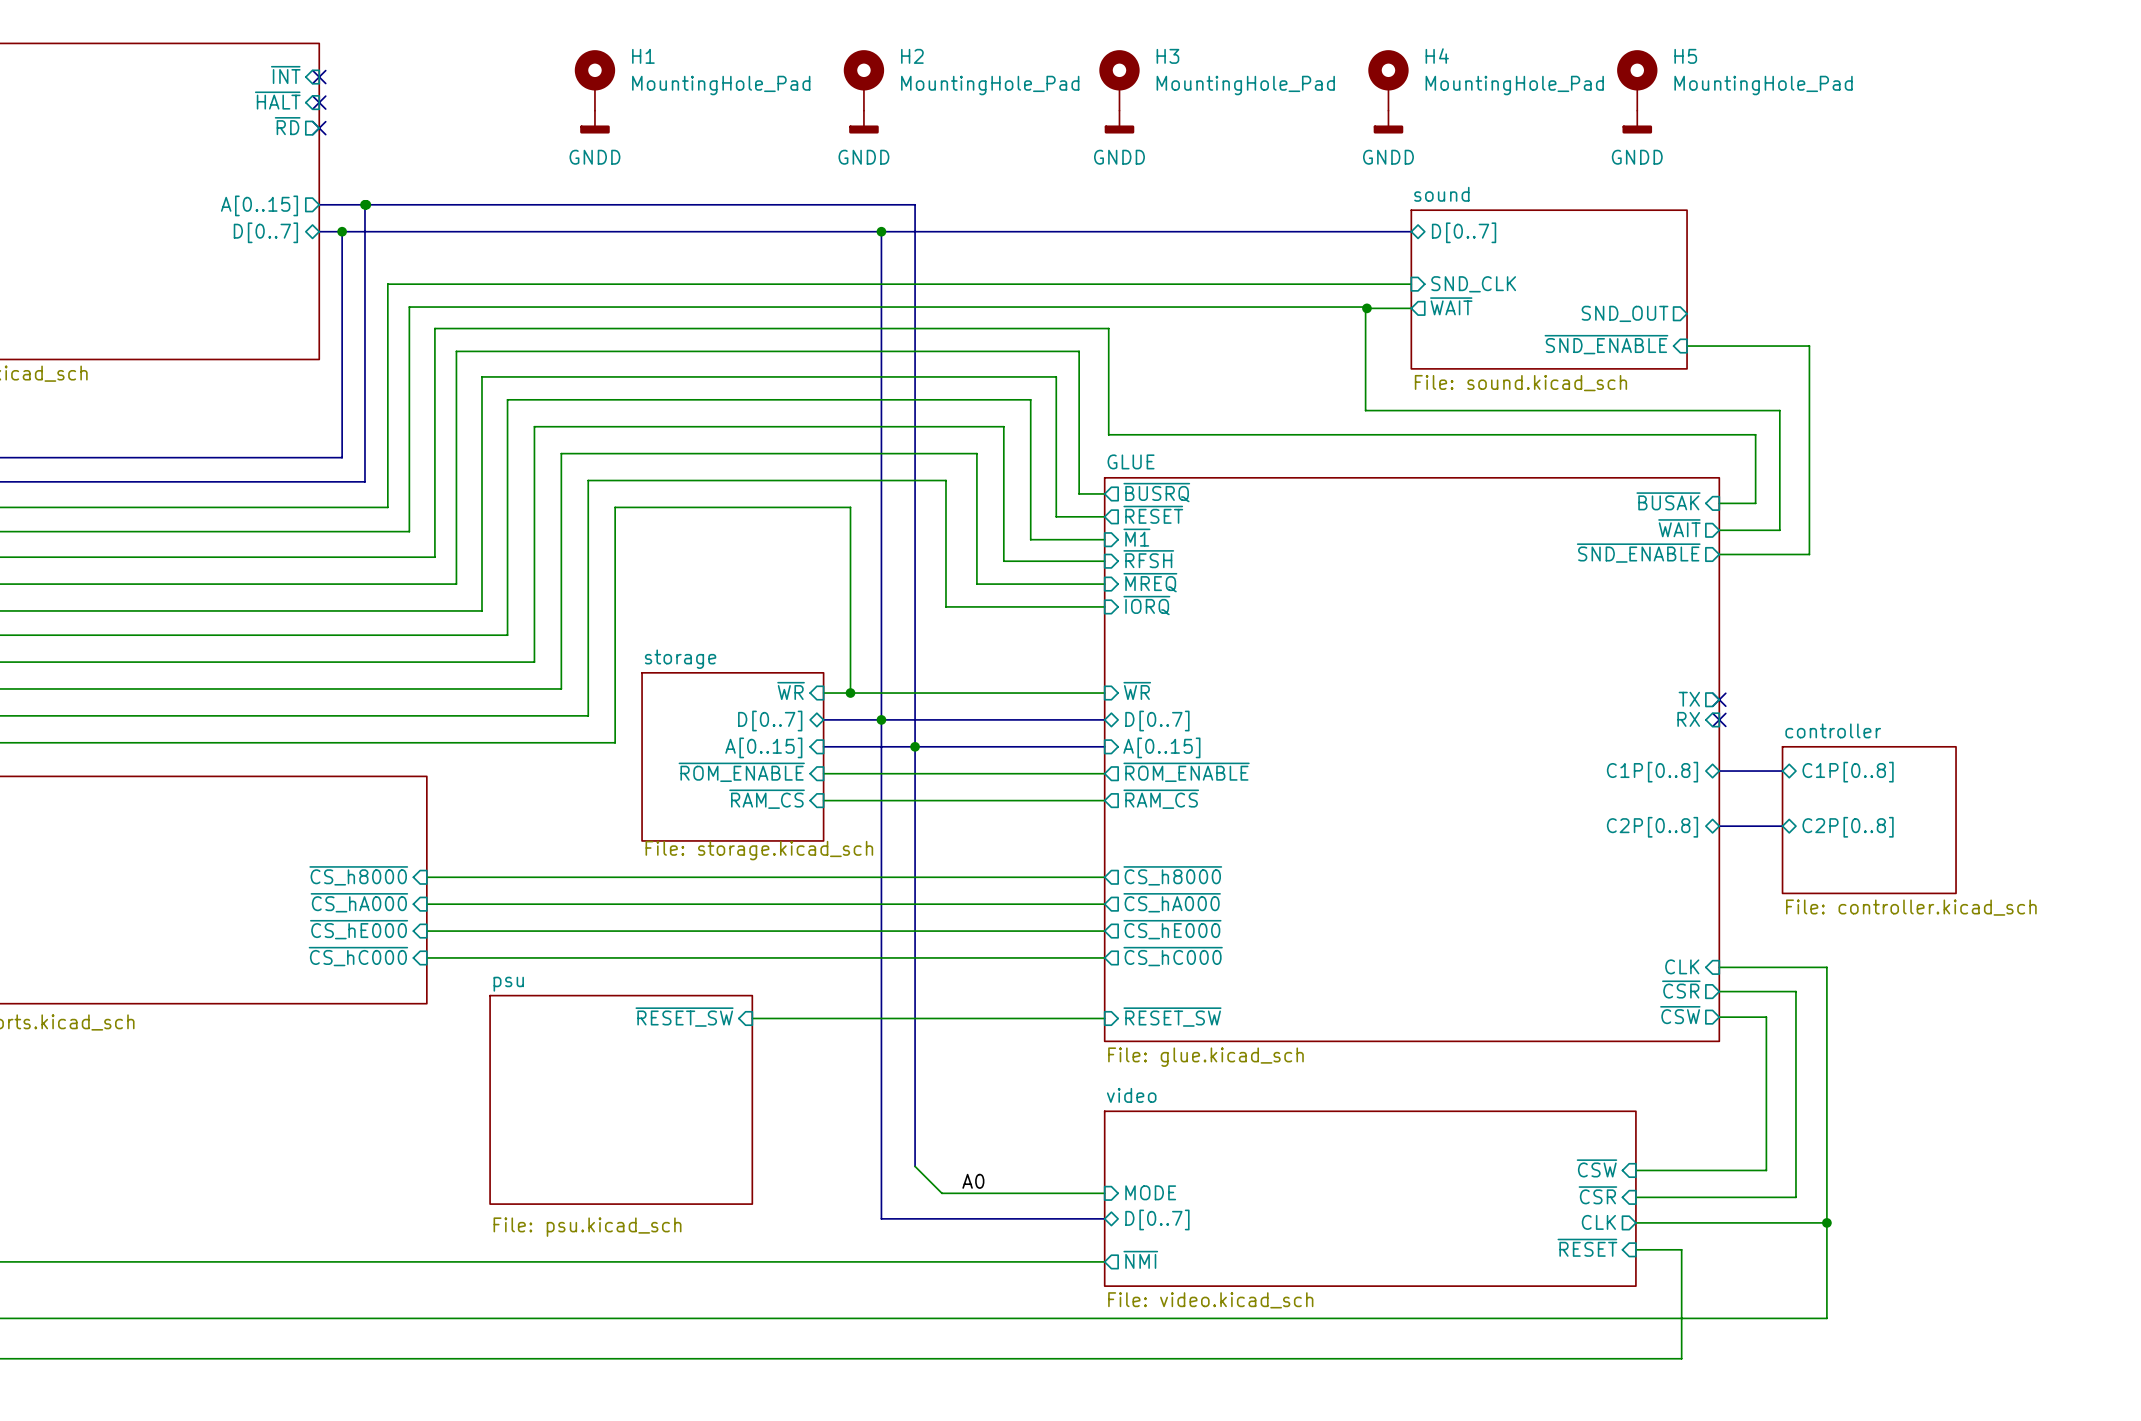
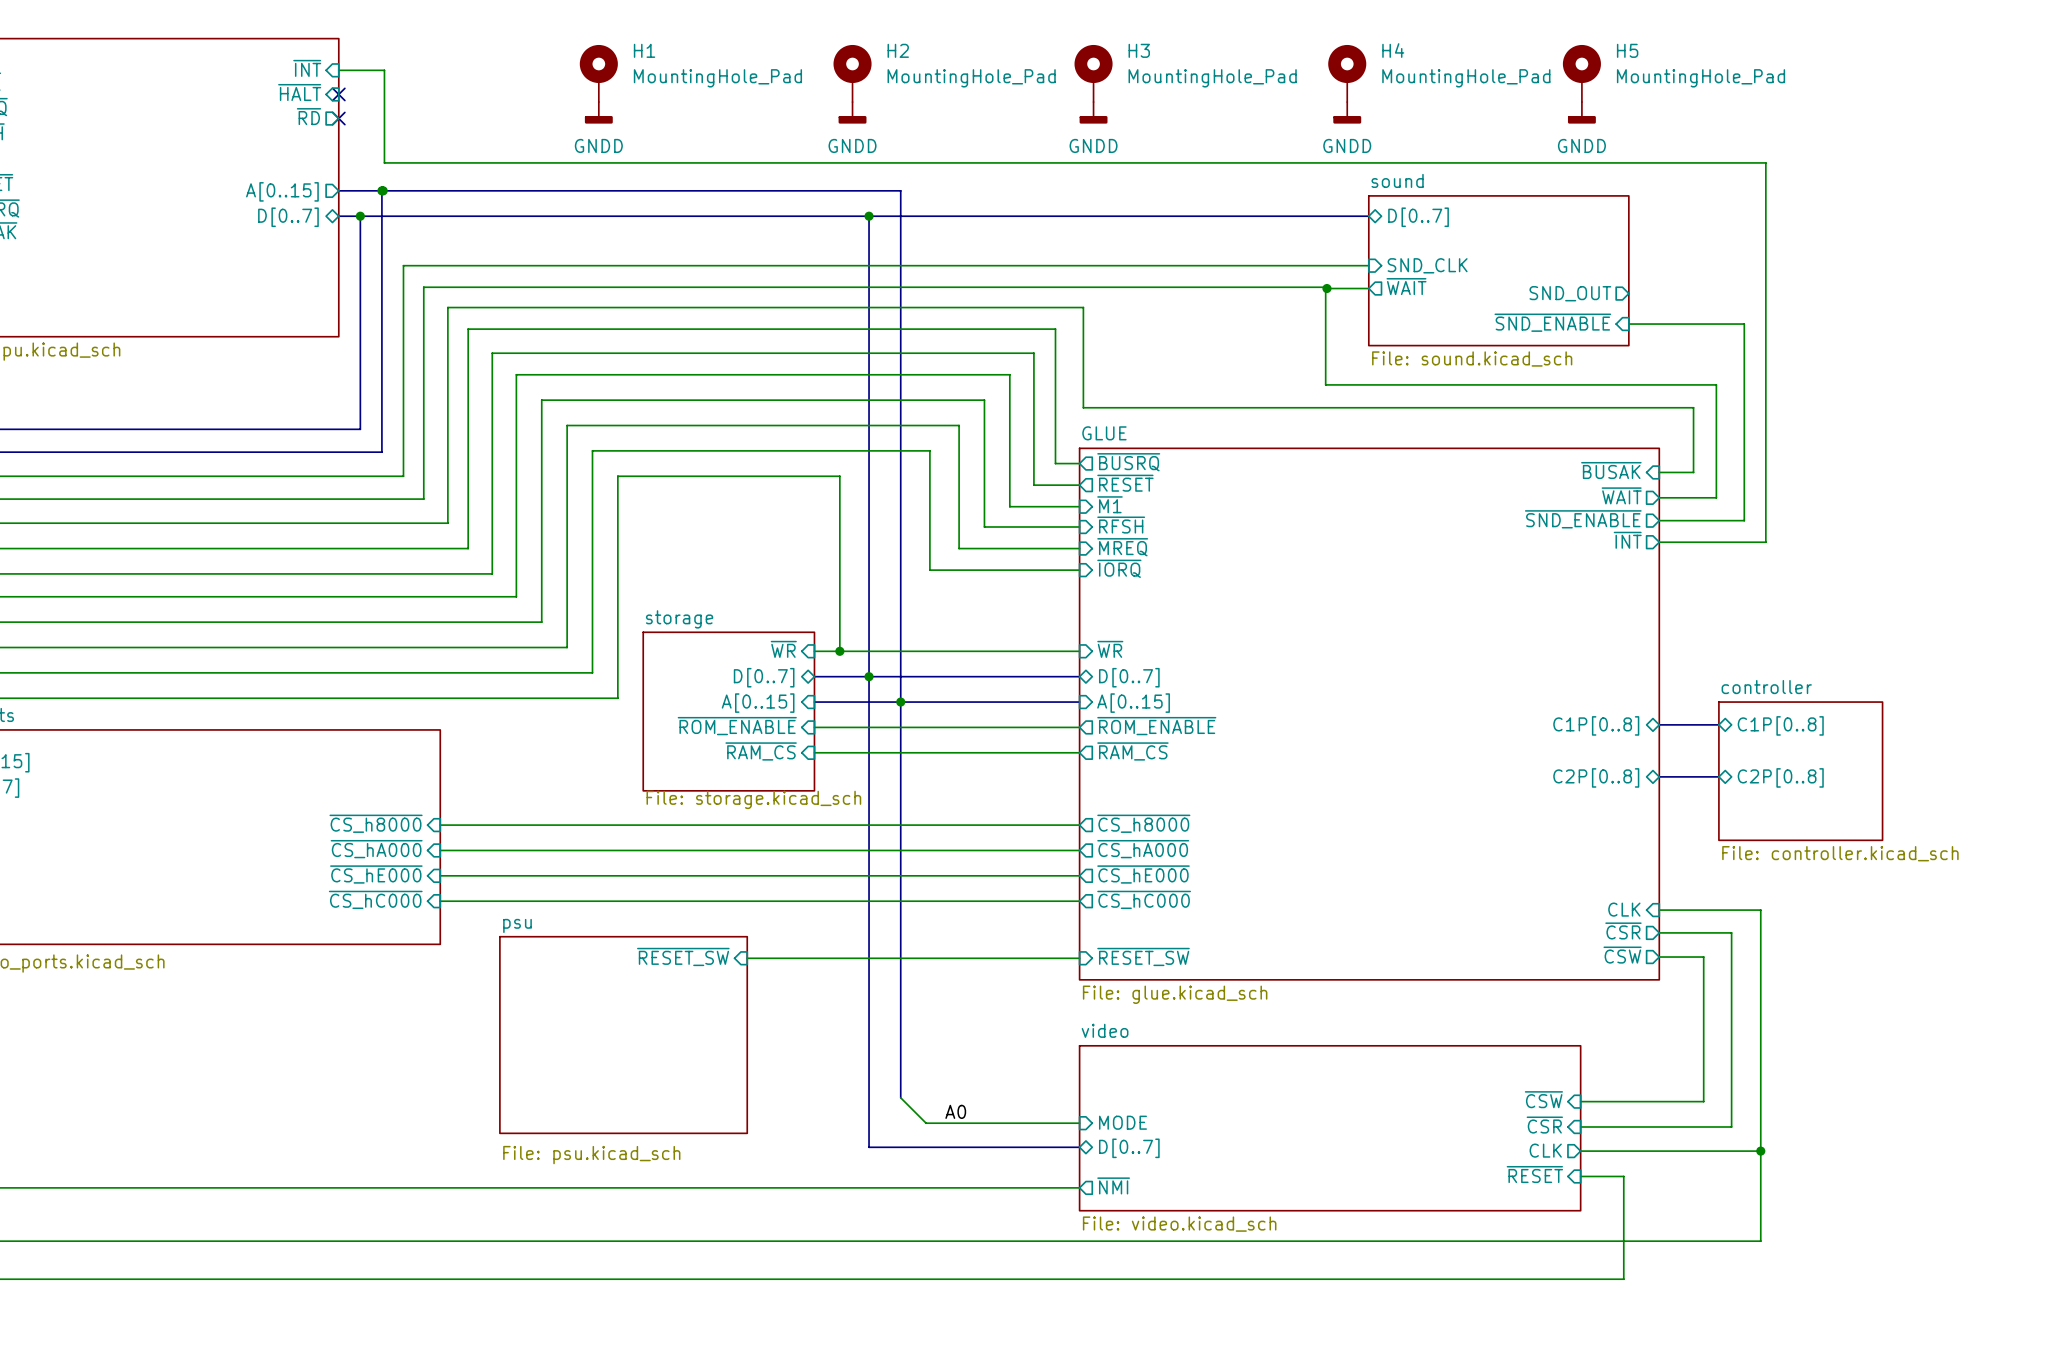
wire: none -> (338, 70) (384, 70) (384, 162) (1765, 162) (1765, 542) (1659, 542)
no-connect mark: (319, 77) -> none
sheet pin: none -> ~{INT} (1627, 540)
sheet pin: TX (1689, 699) -> none
no-connect mark: (1719, 699) -> none
sheet pin: RX (1688, 719) -> none
no-connect mark: (1719, 719) -> none

